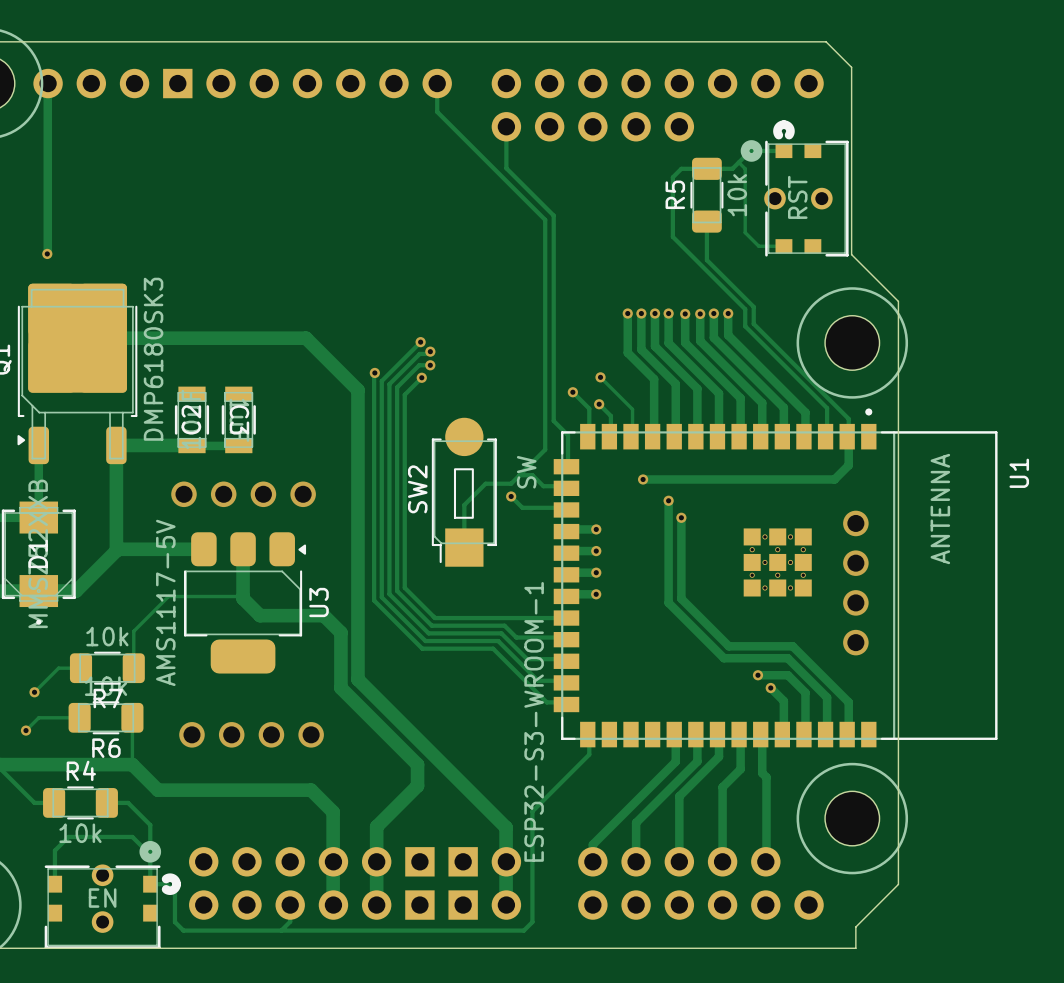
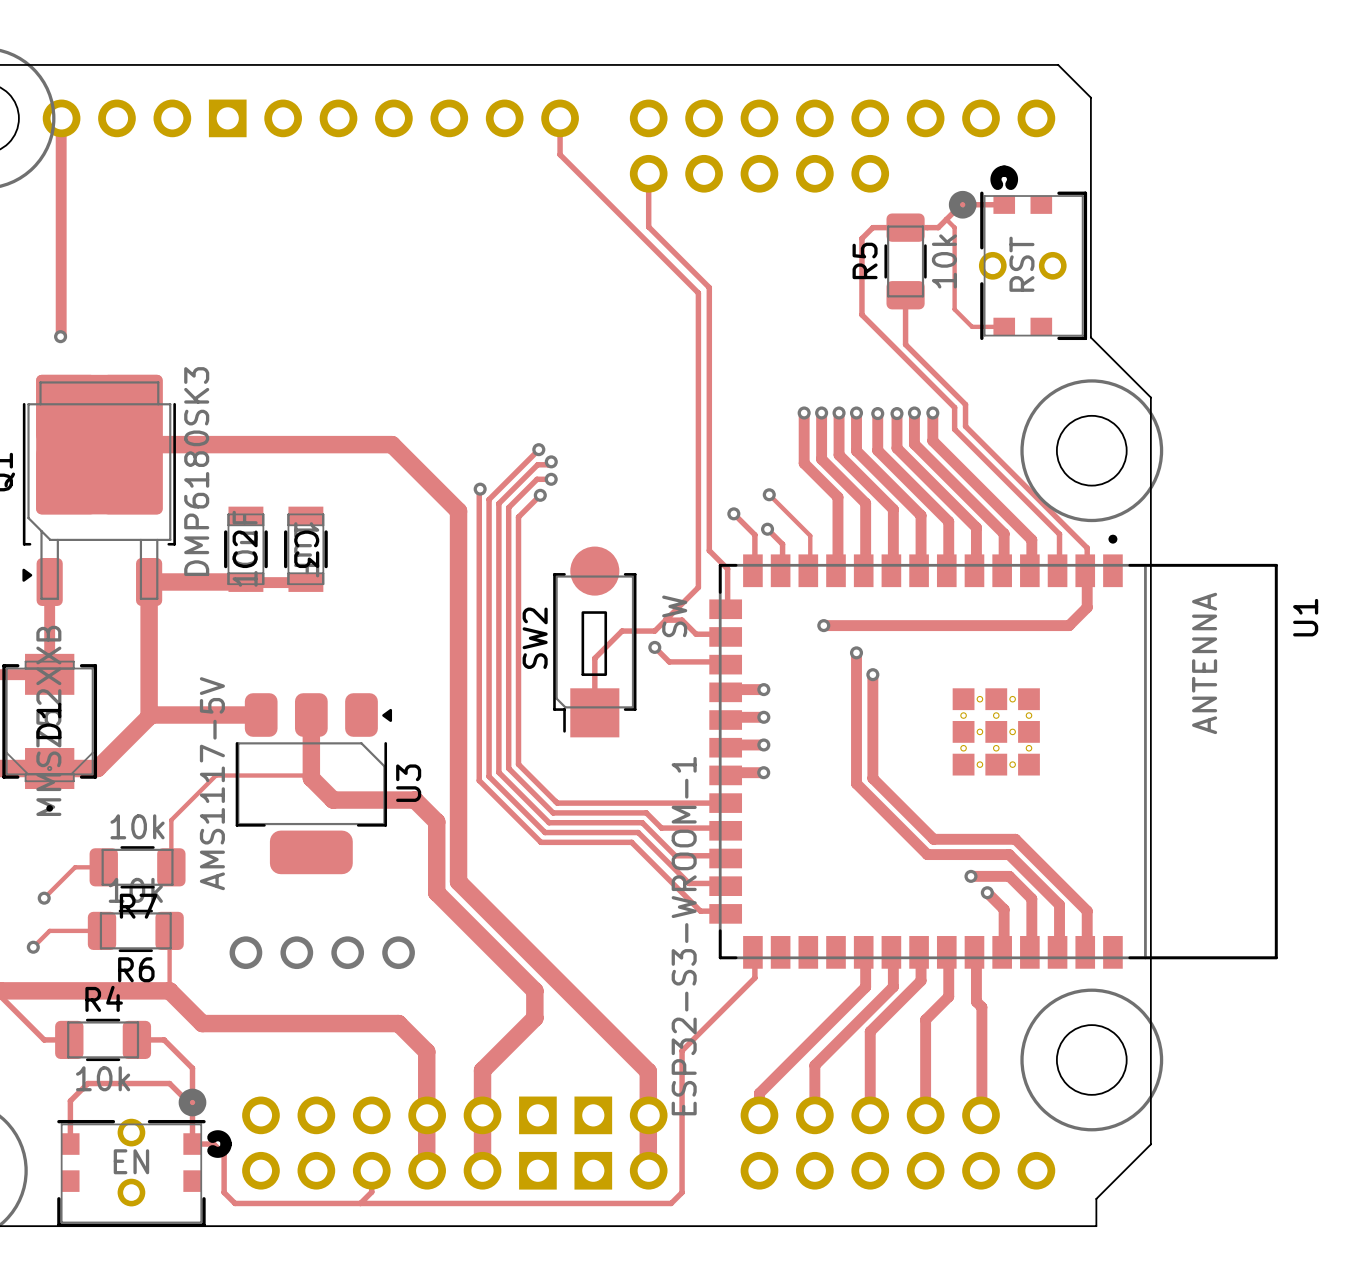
via: (183, 494) -> none
via: (223, 494) -> none
via: (263, 494) -> none
via: (303, 494) -> none
via: (855, 523) -> none
via: (855, 563) -> none
via: (855, 602) -> none
via: (855, 642) -> none

